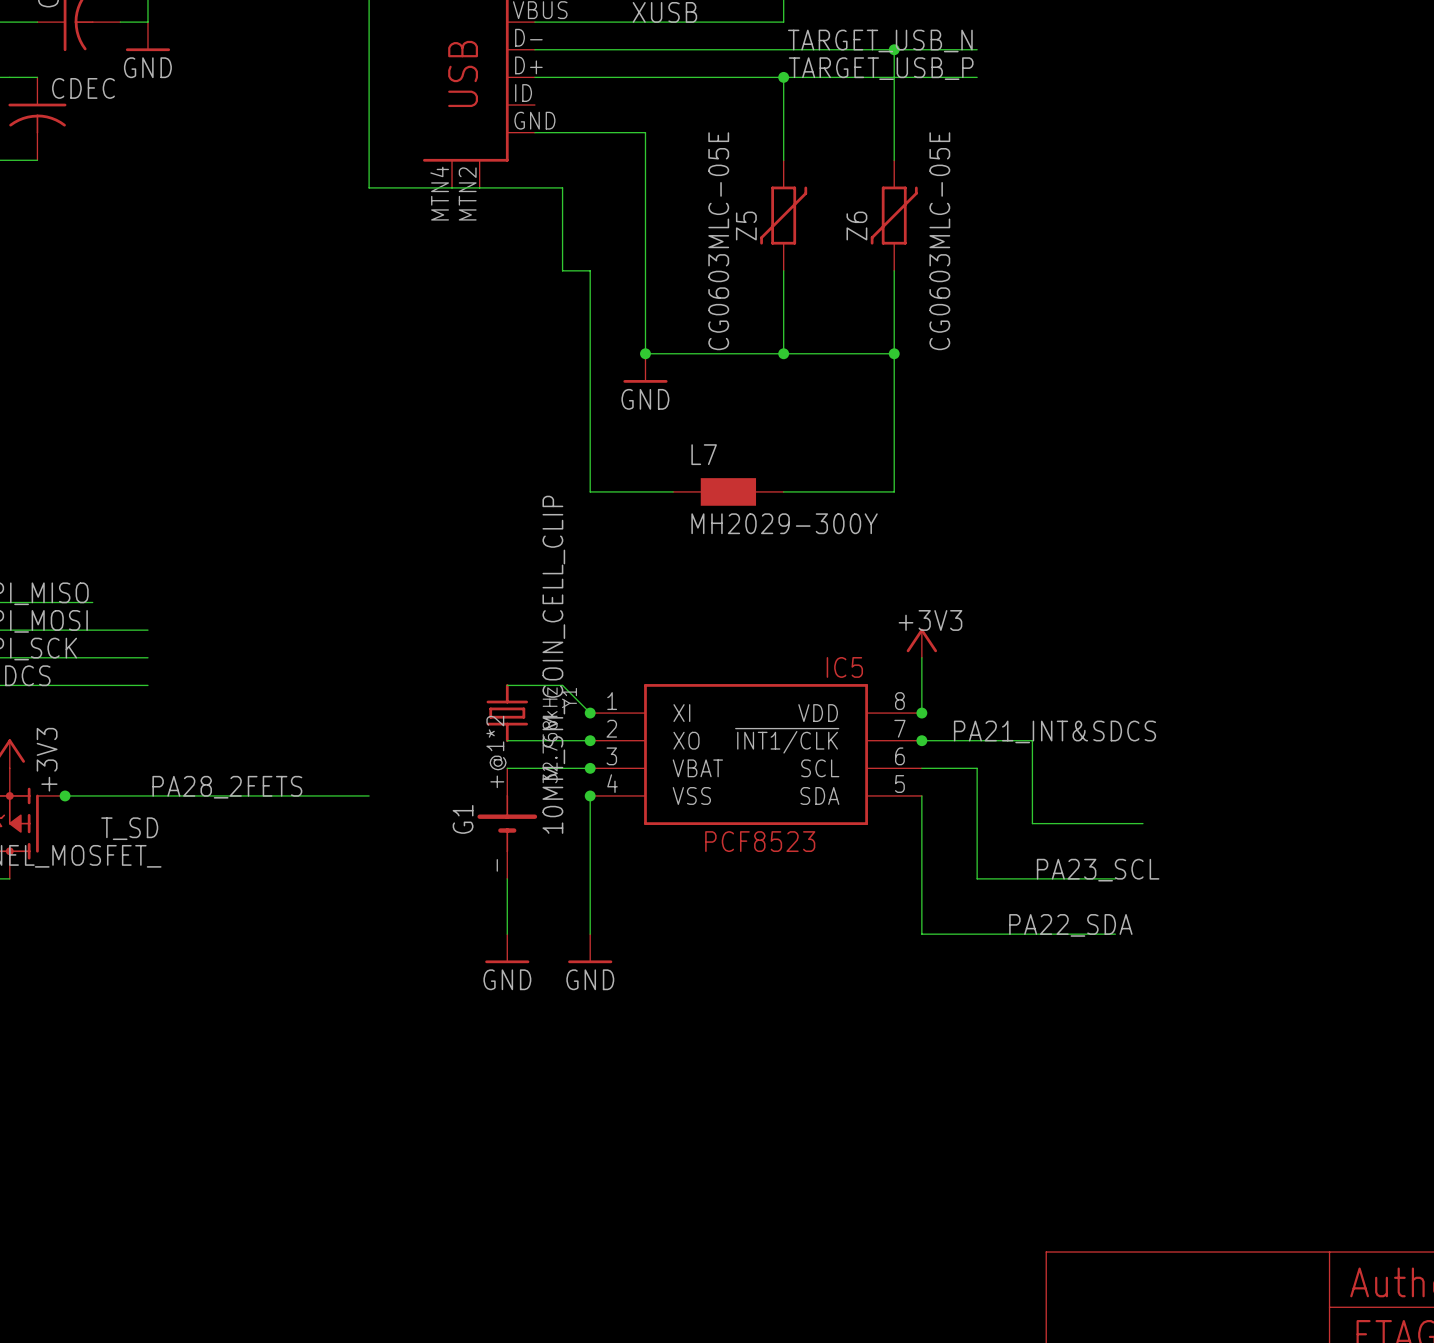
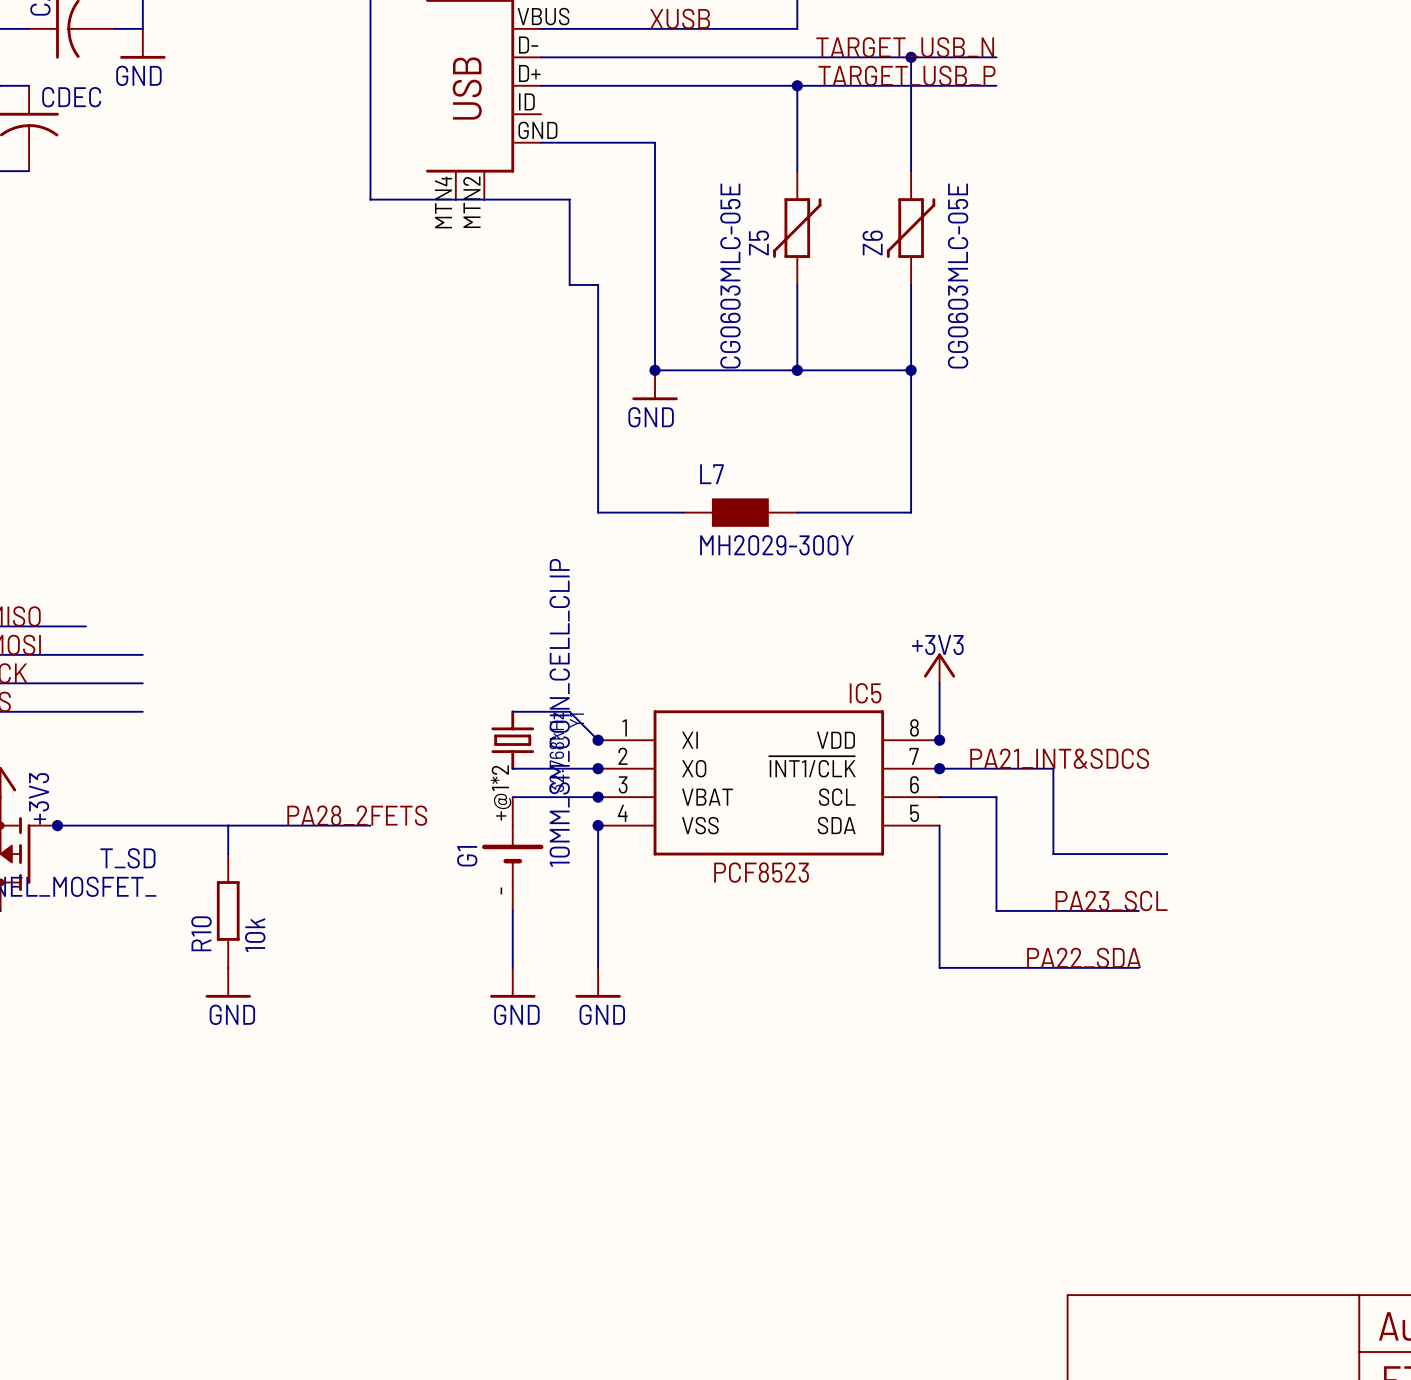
label position: PA28_2FETS (227, 787) -> PA28_2FETS (357, 815)
wire: none -> (228, 825) (228, 854)
R10: none -> 10k (228, 910)
power symbol: none -> GND (228, 982)

